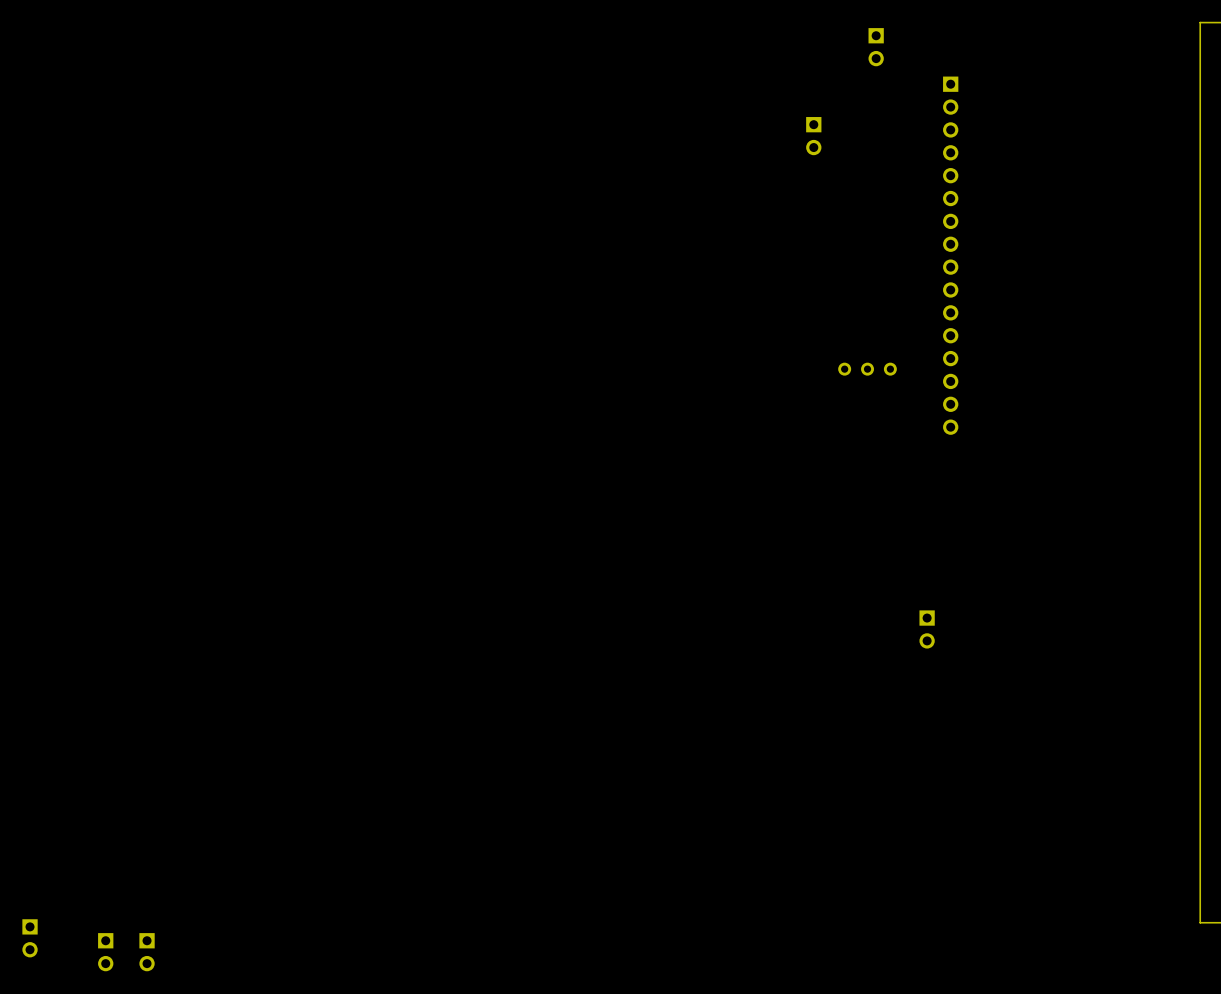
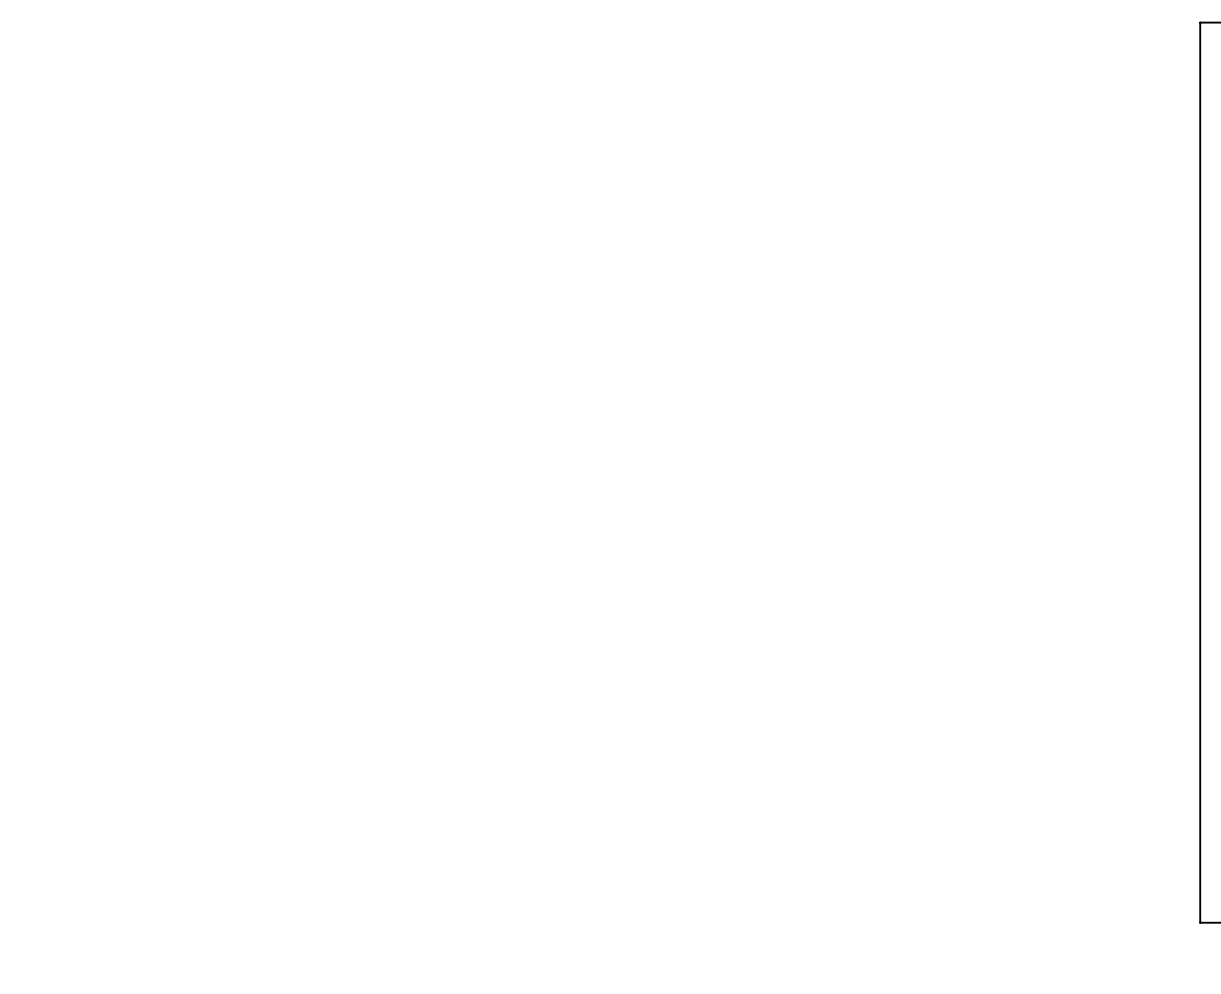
part: (876, 47) -> none
part: (813, 136) -> none
part: (950, 255) -> none
part: (867, 369) -> none
part: (927, 629) -> none
part: (30, 938) -> none
part: (105, 952) -> none
part: (147, 952) -> none

